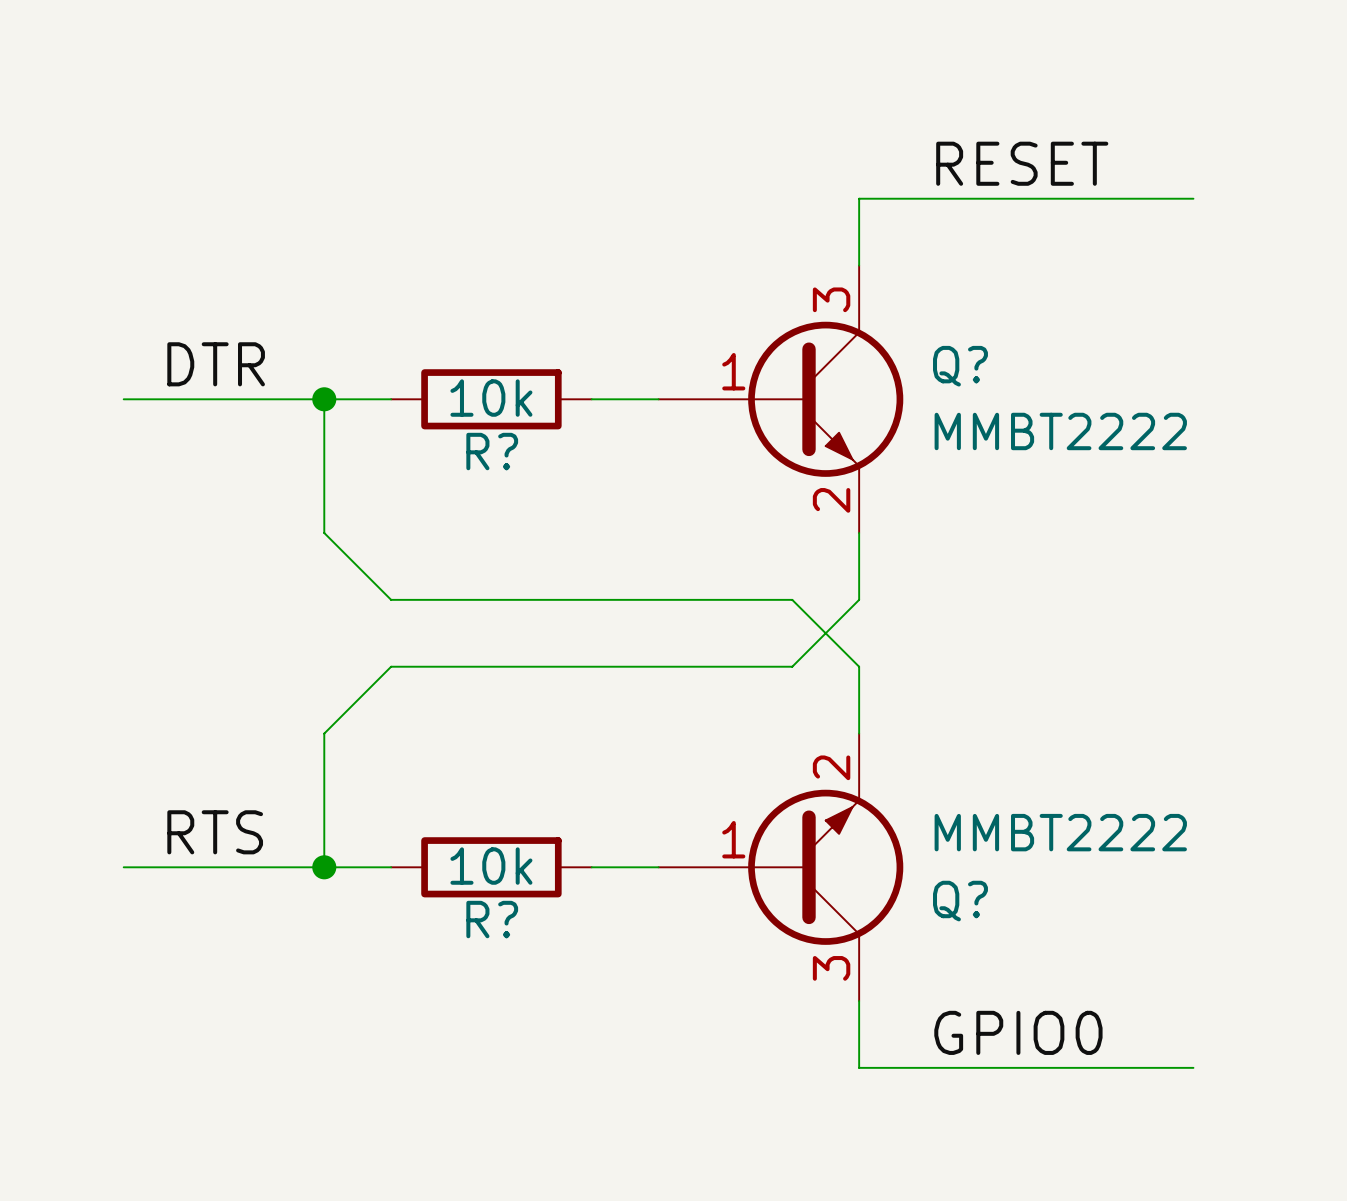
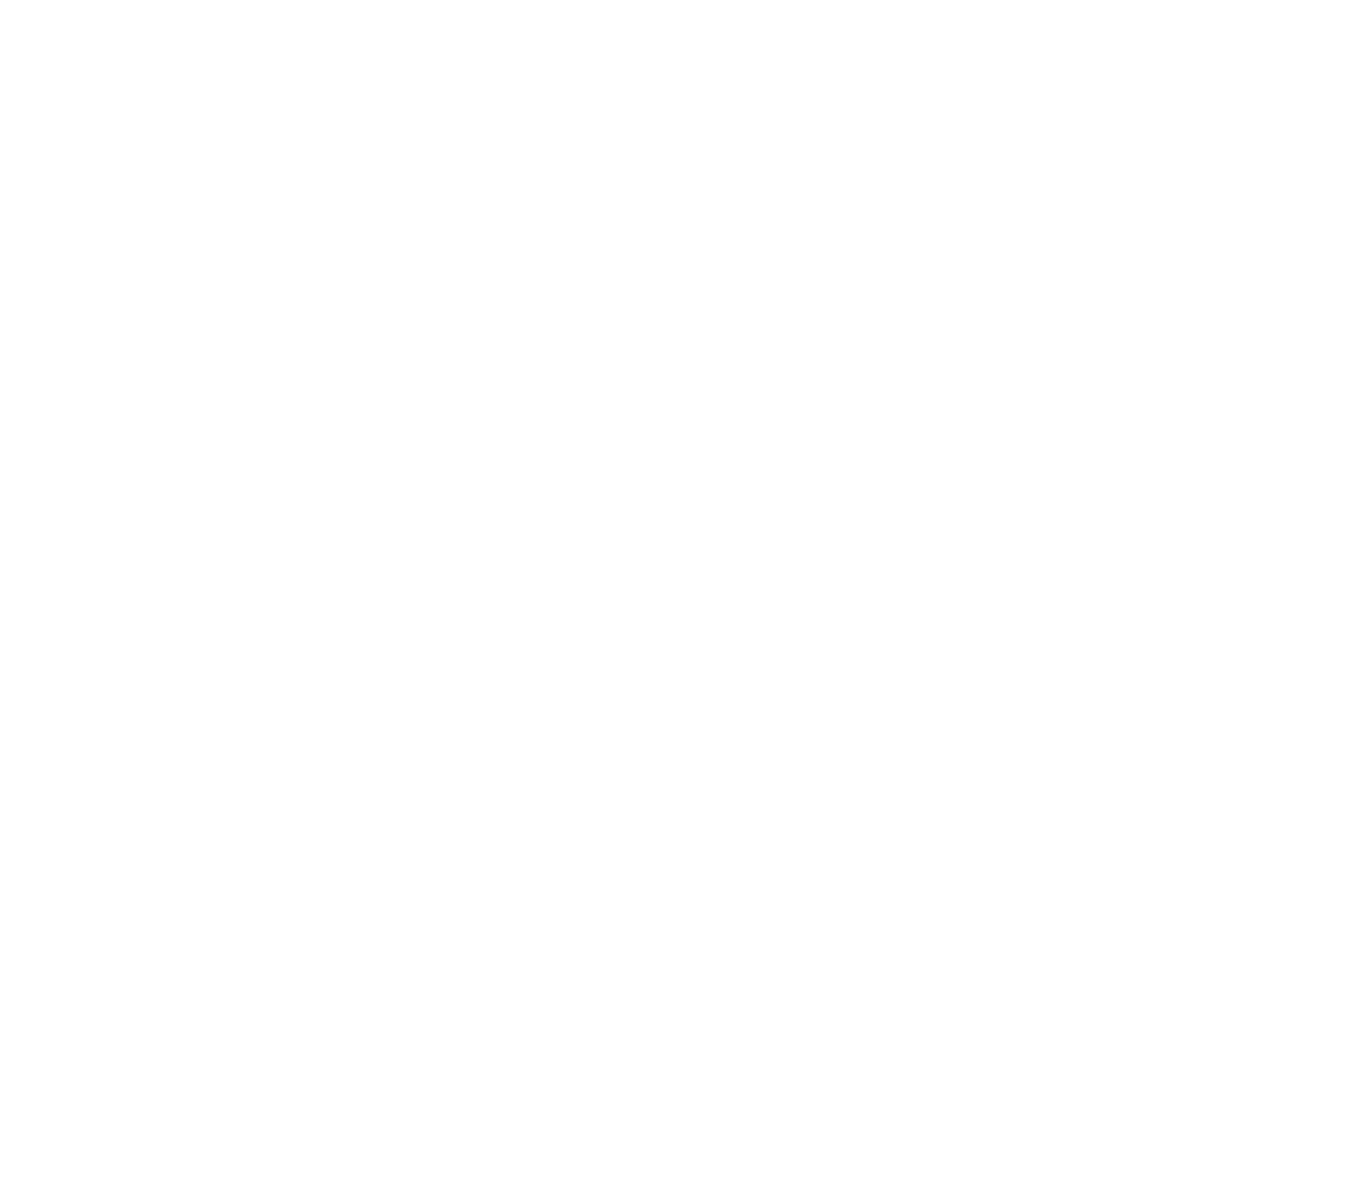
label: RESET (1022, 163) -> none
wire: (1193, 198) (859, 198) (859, 265) -> none
label: DTR (216, 364) -> none
wire: (123, 399) (391, 399) -> none
wire: (324, 399) (324, 533) (391, 599) (792, 599) (859, 666) (859, 733) -> none
junction: (324, 399) -> none
R?: 10k (491, 399) -> none
wire: (591, 399) (658, 399) -> none
Q?: MMBT2222 (780, 399) -> none
wire: (859, 533) (859, 599) (792, 666) (391, 666) (324, 733) (324, 867) -> none
label: RTS (215, 832) -> none
wire: (123, 867) (391, 867) -> none
junction: (324, 867) -> none
R?: 10k (491, 867) -> none
wire: (591, 867) (658, 867) -> none
Q?: MMBT2222 (780, 867) -> none
wire: (859, 1001) (859, 1067) (1193, 1067) -> none
label: GPIO0 (1018, 1032) -> none

